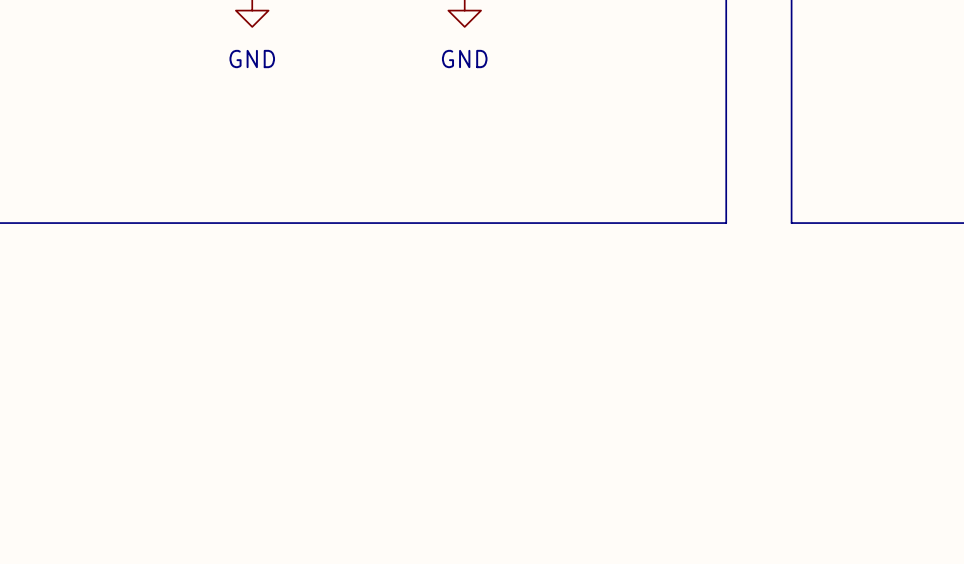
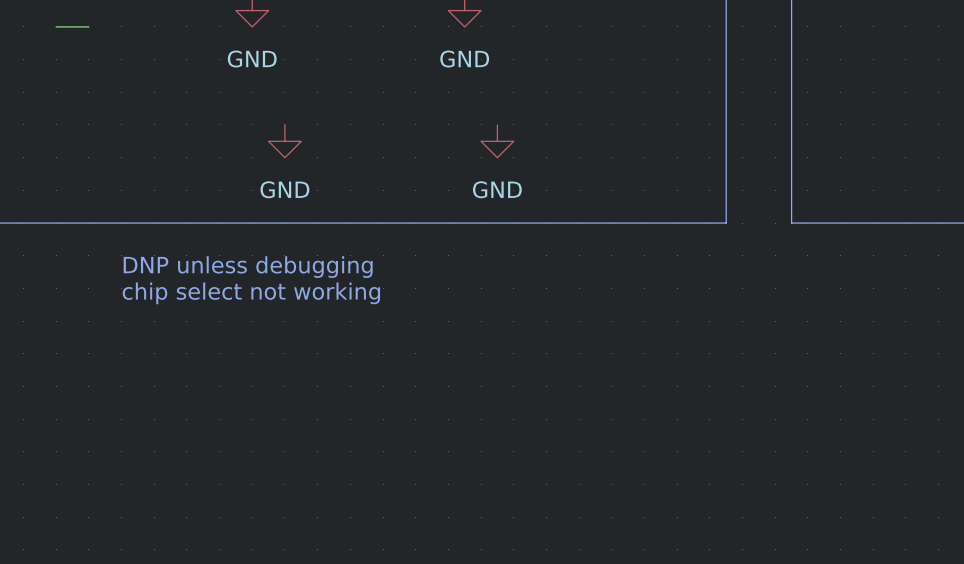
wire: none -> (56, 26) (88, 26)
power symbol: none -> GND (284, 141)
power symbol: none -> GND (497, 141)
text: none -> DNP unless debugging (248, 267)
text: none -> chip select not working (251, 293)

